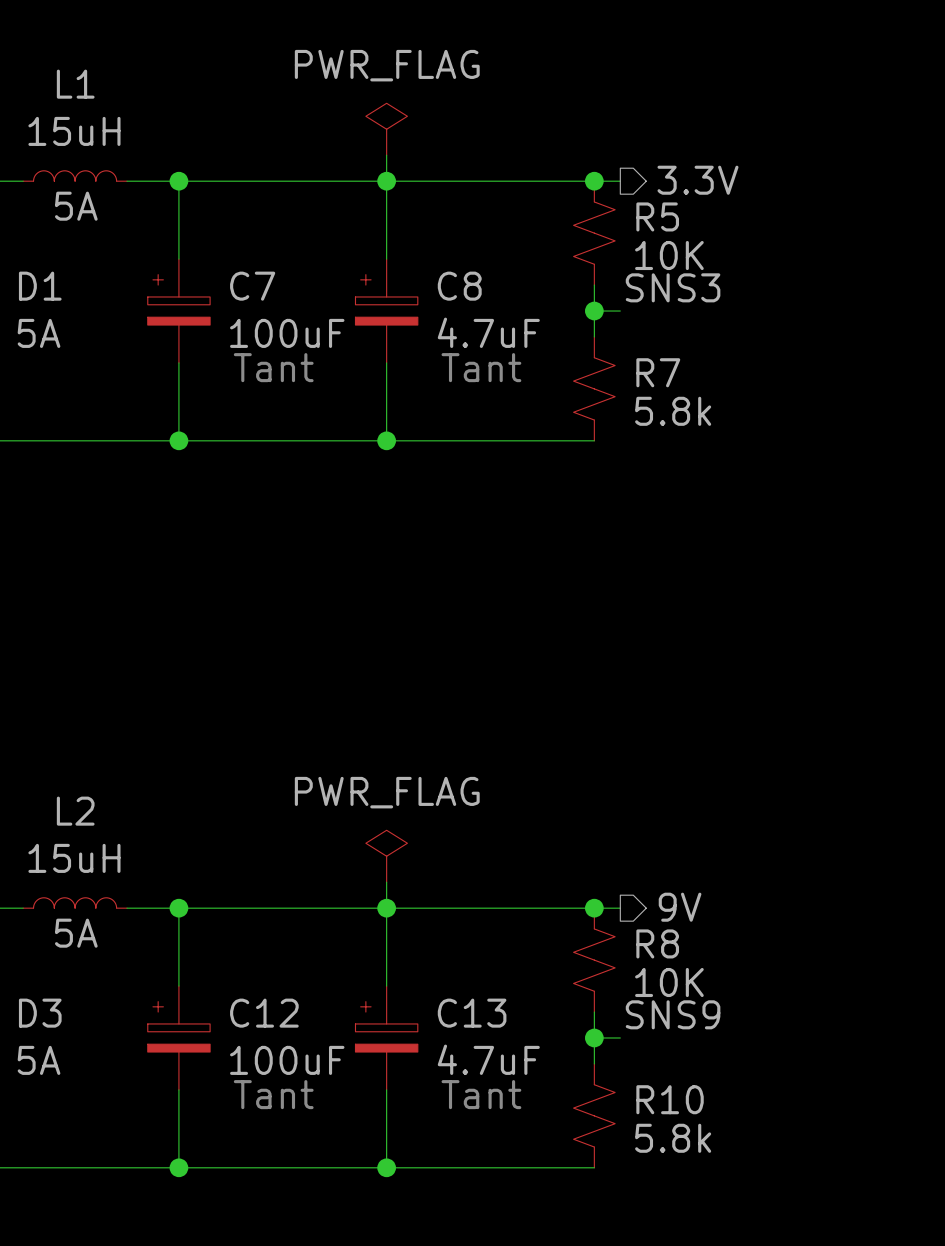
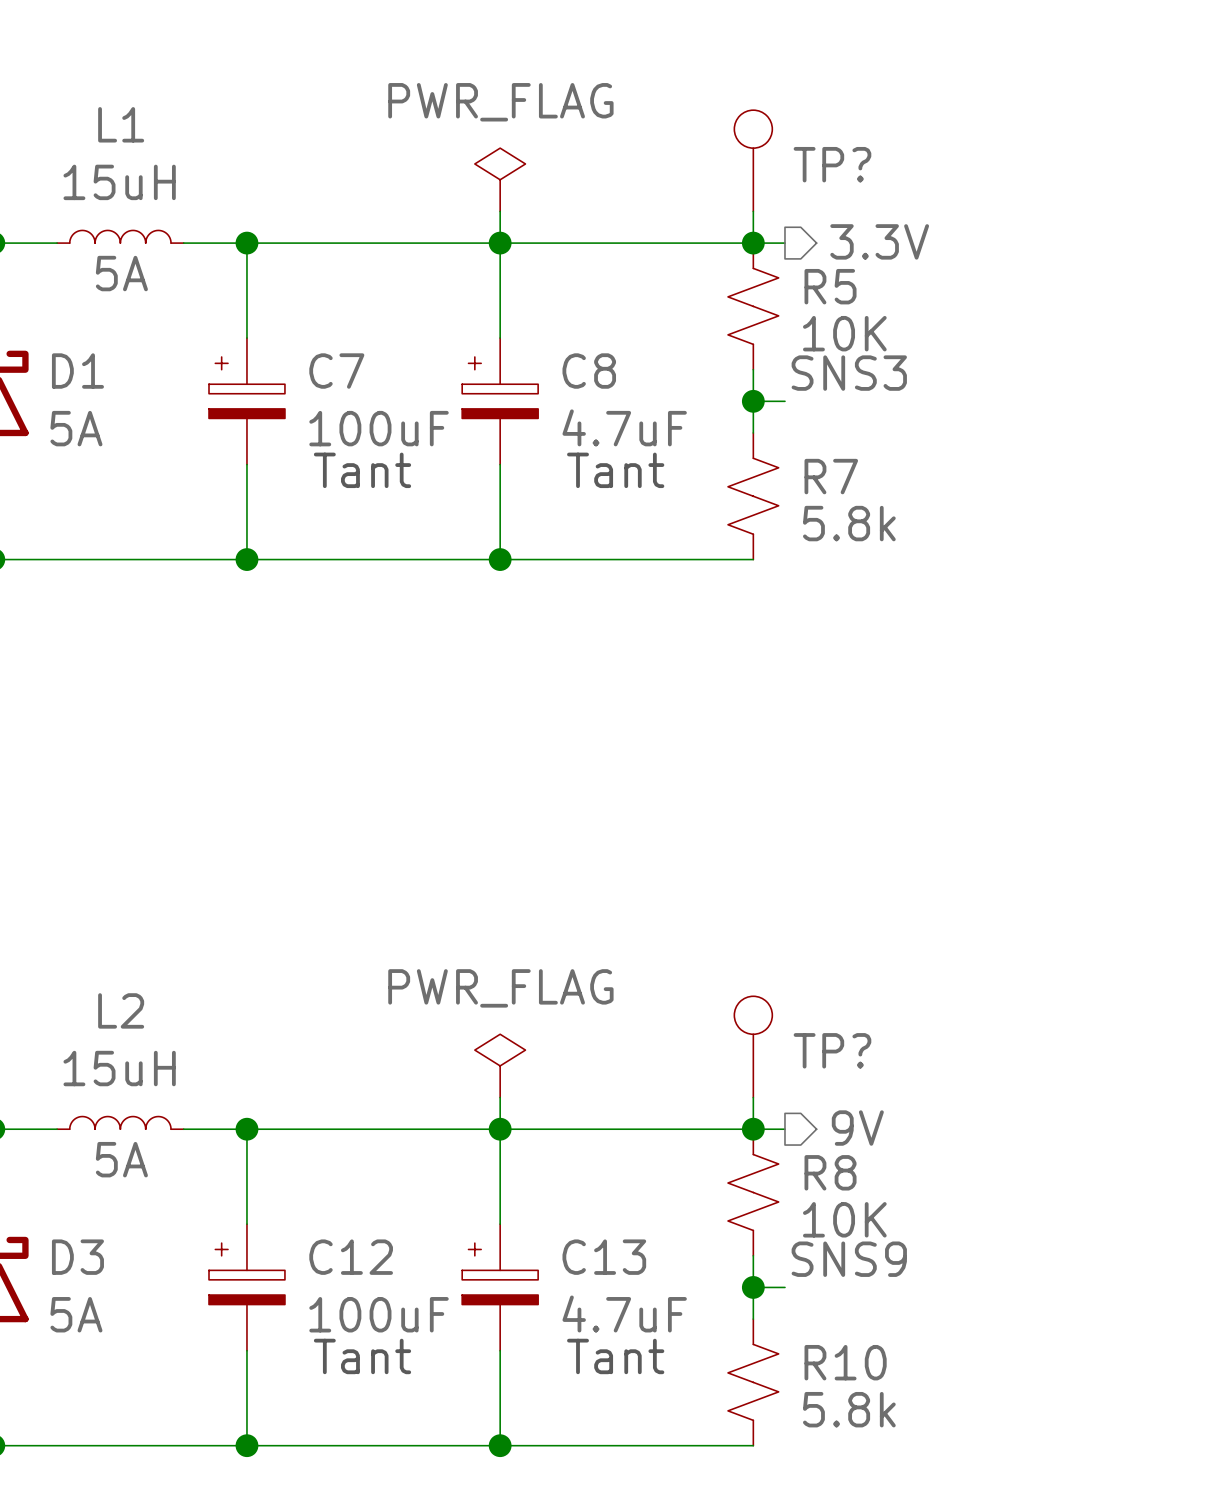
TP?: none -> (753, 160)
wire: none -> (753, 211) (753, 243)
TP?: none -> (753, 1046)
wire: none -> (753, 1097) (753, 1129)

